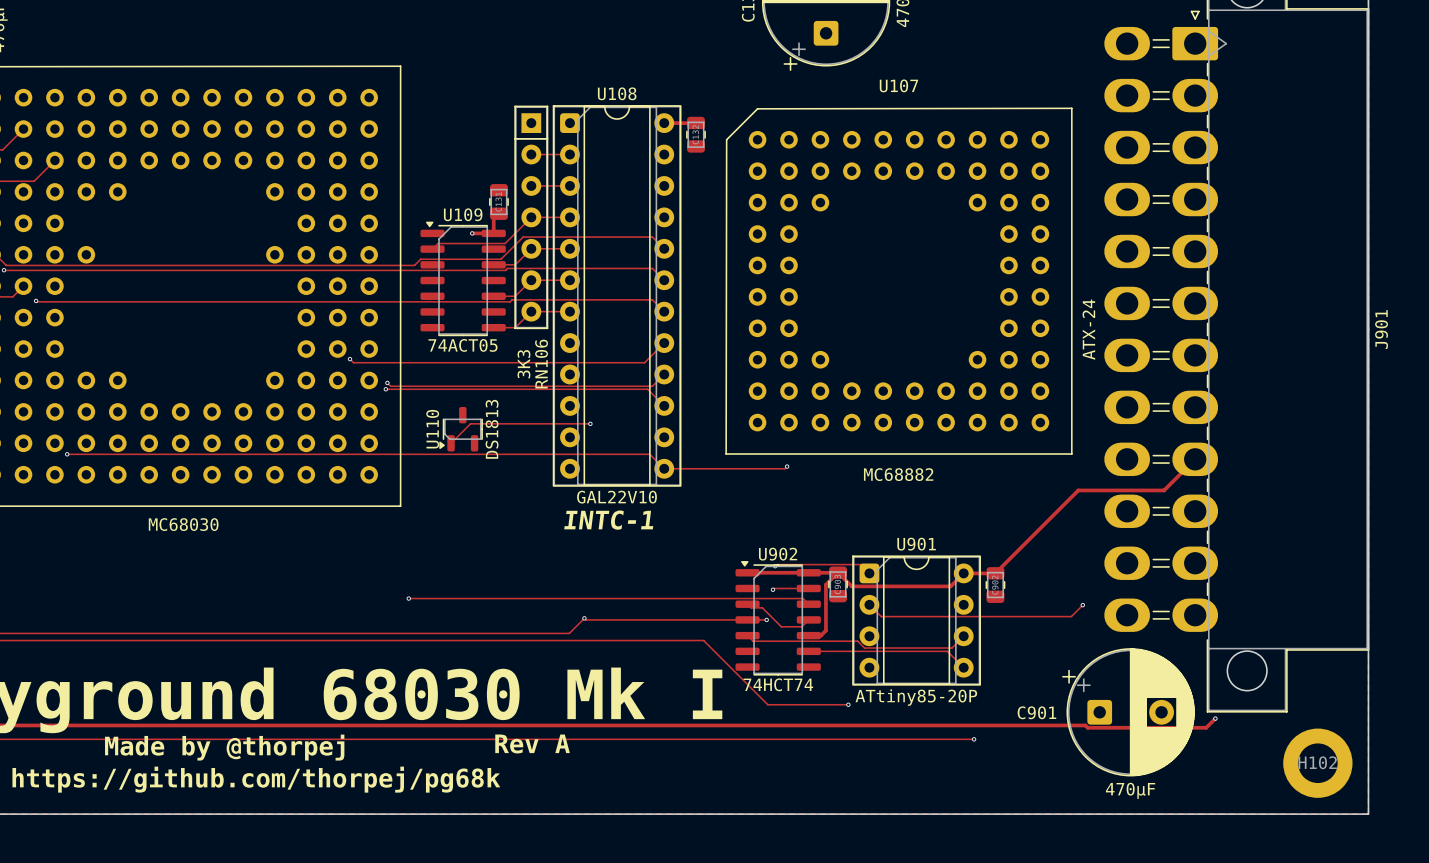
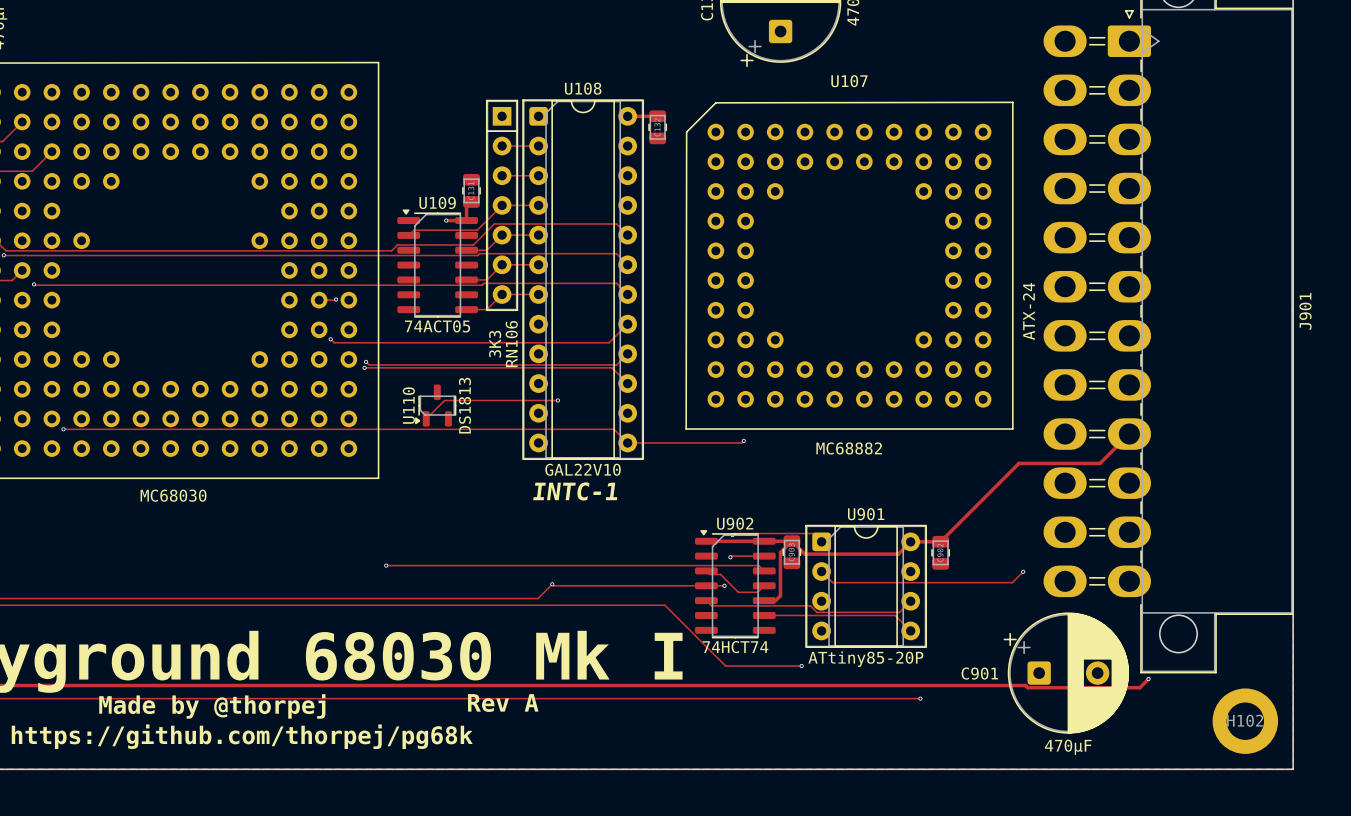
track: none -> (336, 299) (319, 300)
via: none -> (336, 299)

